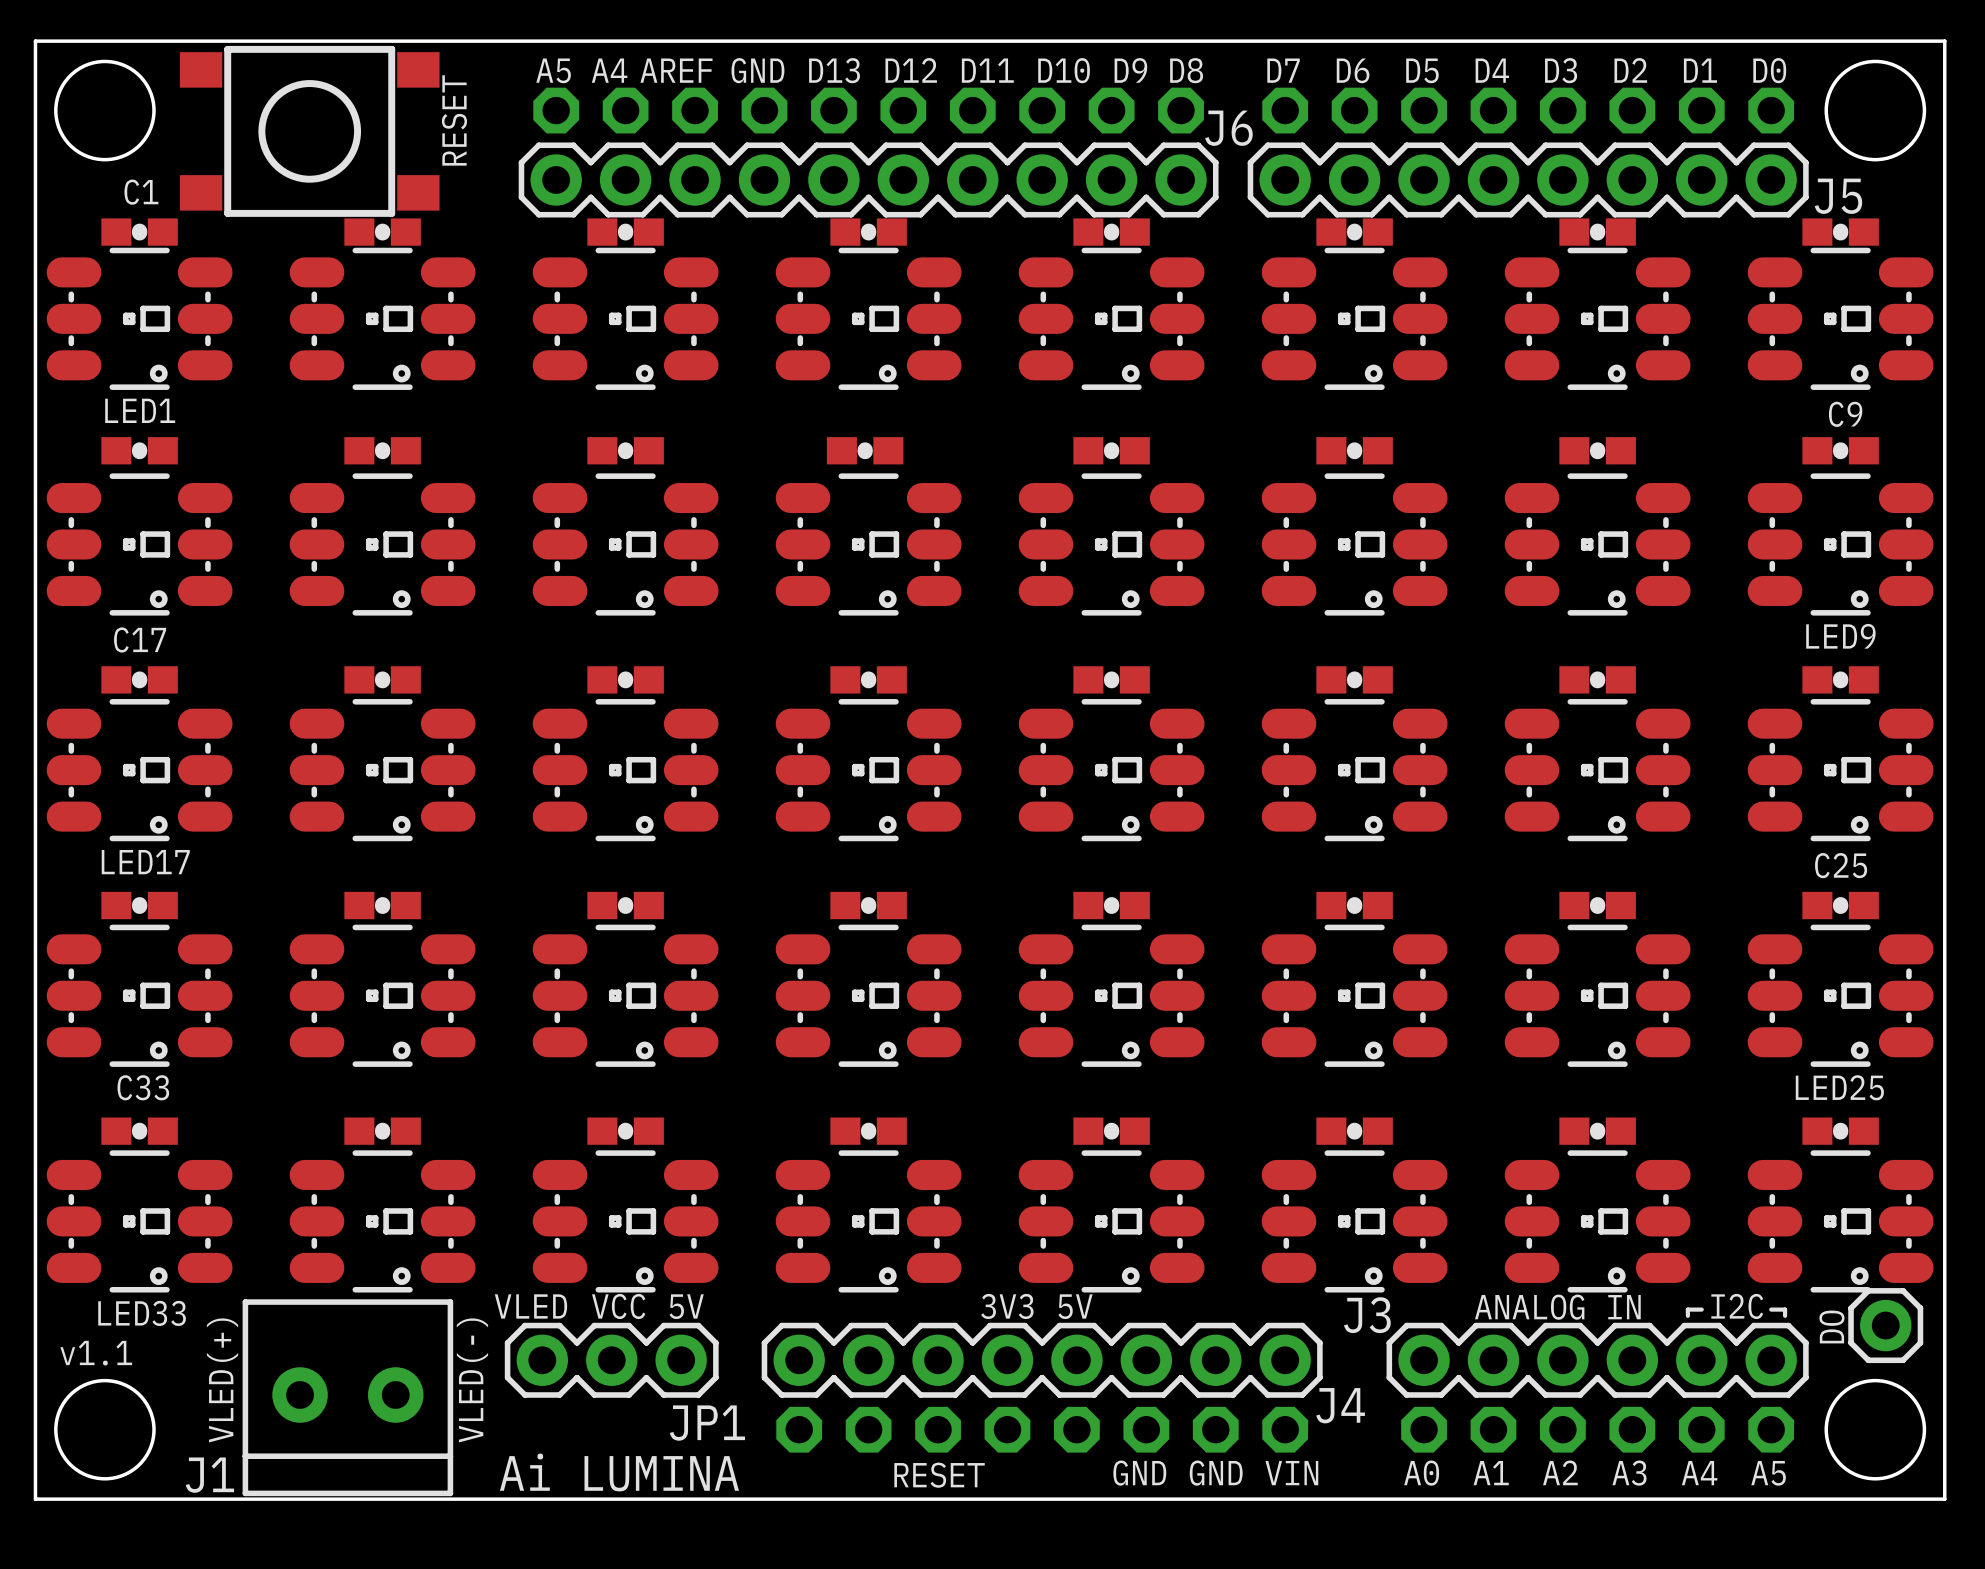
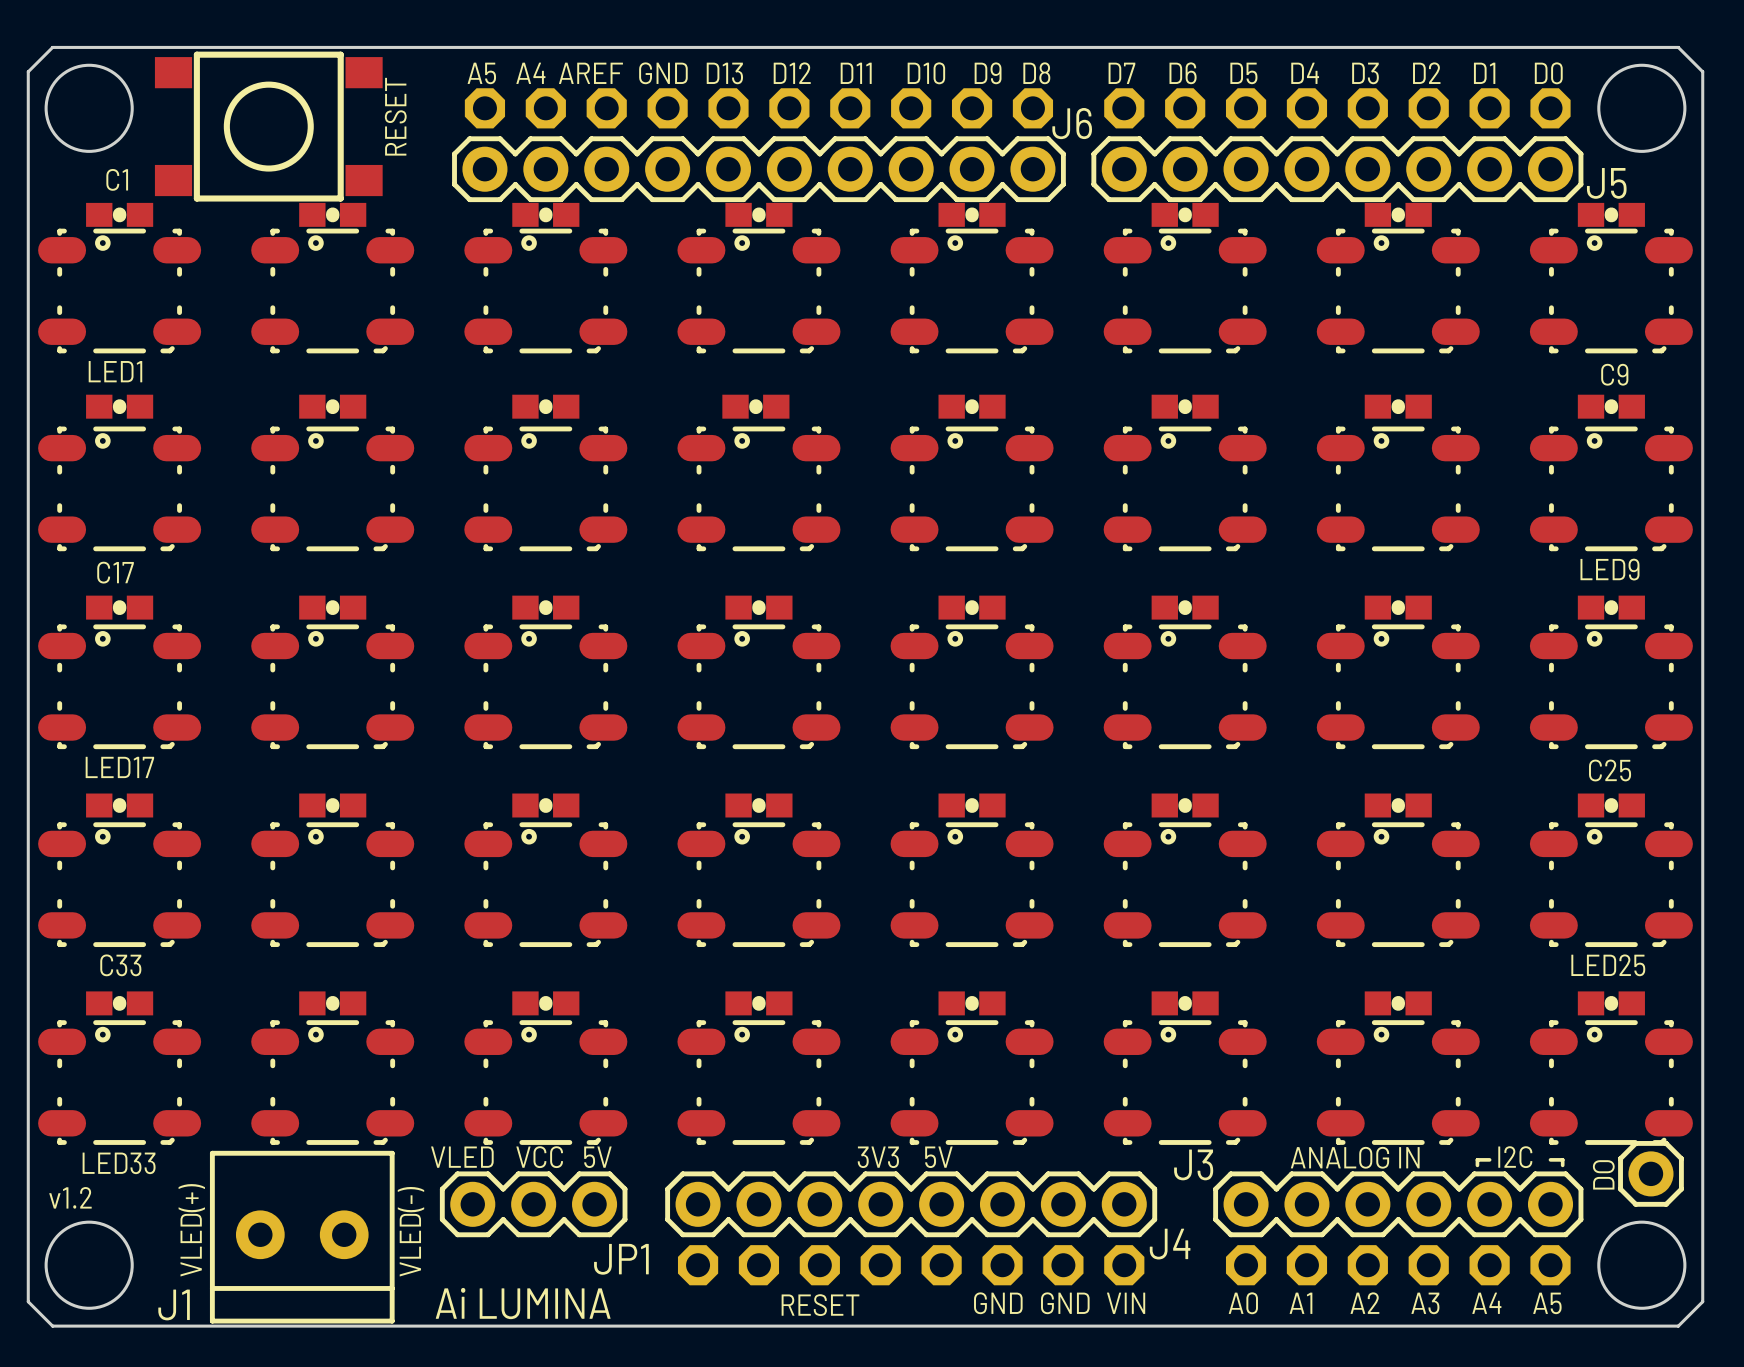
part footprint: [33, 39, 1947, 1501] -> [26, 45, 1705, 1328]
part footprint: [46, 247, 233, 390] -> [38, 228, 202, 354]
part footprint: [289, 247, 476, 390] -> [251, 228, 415, 354]
part footprint: [532, 247, 719, 390] -> [464, 228, 628, 354]
part footprint: [775, 247, 962, 390] -> [677, 228, 841, 354]
part footprint: [1018, 247, 1205, 390] -> [890, 228, 1054, 354]
part footprint: [1261, 247, 1448, 390] -> [1103, 228, 1267, 354]
part footprint: [1504, 247, 1691, 390] -> [1316, 228, 1480, 354]
part footprint: [1747, 247, 1934, 390] -> [1529, 228, 1693, 354]
part footprint: [46, 473, 233, 616] -> [38, 426, 202, 552]
part footprint: [289, 473, 476, 616] -> [251, 426, 415, 552]
part footprint: [532, 473, 719, 616] -> [464, 426, 628, 552]
part footprint: [775, 473, 962, 616] -> [677, 426, 841, 552]
part footprint: [1018, 473, 1205, 616] -> [890, 426, 1054, 552]
part footprint: [1261, 473, 1448, 616] -> [1103, 426, 1267, 552]
part footprint: [1504, 473, 1691, 616] -> [1316, 426, 1480, 552]
part footprint: [1747, 473, 1934, 616] -> [1529, 426, 1693, 552]
part footprint: [46, 699, 233, 842] -> [38, 624, 202, 750]
part footprint: [289, 699, 476, 842] -> [251, 624, 415, 750]
part footprint: [532, 699, 719, 842] -> [464, 624, 628, 750]
part footprint: [775, 699, 962, 842] -> [677, 624, 841, 750]
part footprint: [1018, 699, 1205, 842] -> [890, 624, 1054, 750]
part footprint: [1261, 699, 1448, 842] -> [1103, 624, 1267, 750]
part footprint: [1504, 699, 1691, 842] -> [1316, 624, 1480, 750]
part footprint: [1747, 699, 1934, 842] -> [1529, 624, 1693, 750]
part footprint: [46, 924, 233, 1067] -> [38, 822, 202, 948]
part footprint: [289, 924, 476, 1067] -> [251, 822, 415, 948]
part footprint: [532, 924, 719, 1067] -> [464, 822, 628, 948]
part footprint: [775, 924, 962, 1067] -> [677, 822, 841, 948]
part footprint: [1018, 924, 1205, 1067] -> [890, 822, 1054, 948]
part footprint: [1261, 924, 1448, 1067] -> [1103, 822, 1267, 948]
part footprint: [1504, 924, 1691, 1067] -> [1316, 822, 1480, 948]
part footprint: [1747, 924, 1934, 1067] -> [1529, 822, 1693, 948]
part footprint: [46, 1150, 233, 1293] -> [38, 1020, 202, 1145]
part footprint: [289, 1150, 476, 1293] -> [251, 1020, 415, 1145]
part footprint: [532, 1150, 719, 1293] -> [464, 1020, 628, 1145]
part footprint: [775, 1150, 962, 1293] -> [677, 1020, 841, 1145]
part footprint: [1018, 1150, 1205, 1293] -> [890, 1020, 1054, 1145]
part footprint: [1261, 1150, 1448, 1293] -> [1103, 1020, 1267, 1145]
part footprint: [1504, 1150, 1691, 1293] -> [1316, 1020, 1480, 1145]
part footprint: [1747, 1150, 1934, 1293] -> [1529, 1020, 1693, 1145]
text: v1.1 (96, 1353) -> v1.2 (70, 1197)

